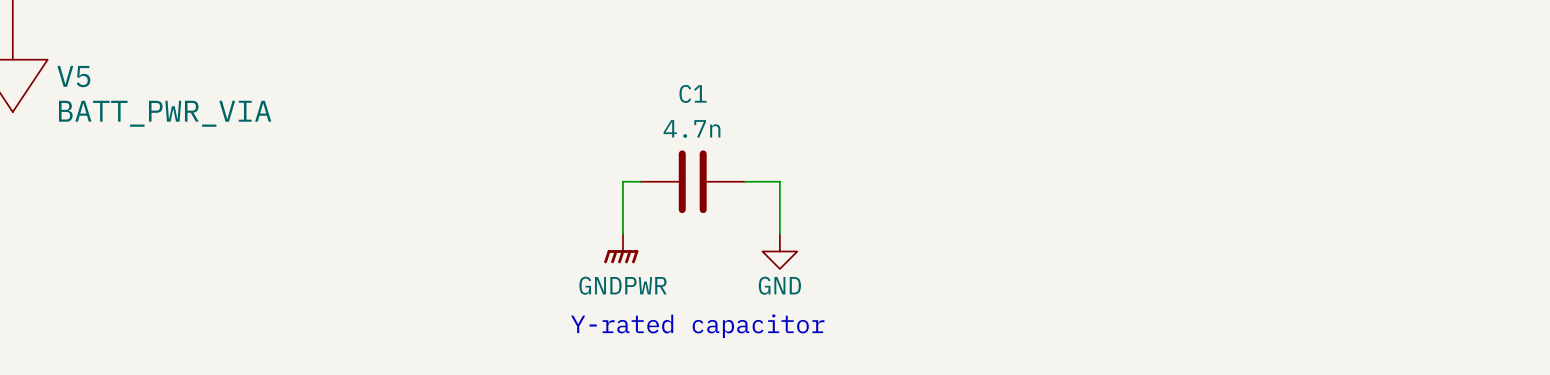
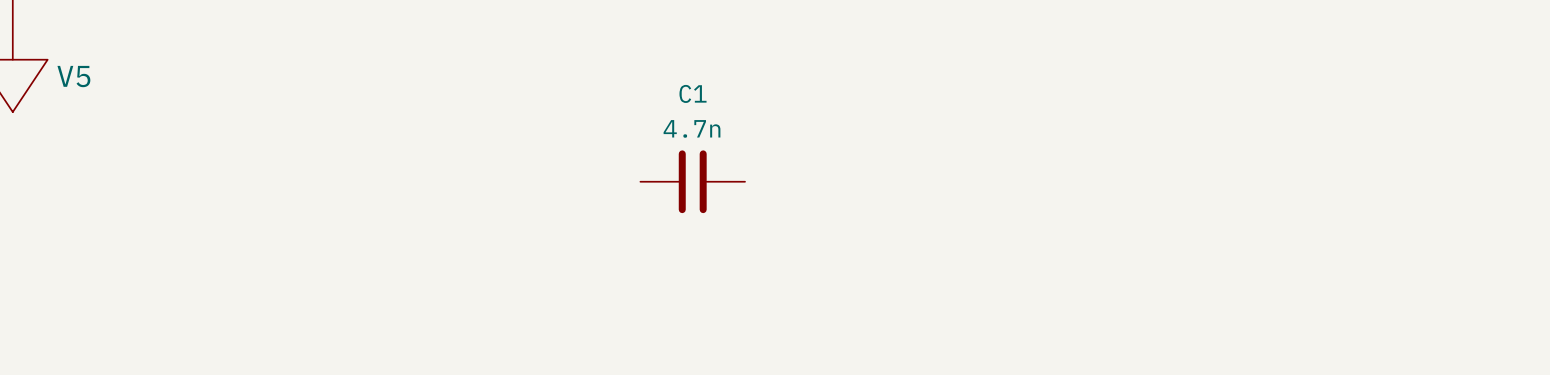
V5 value: BATT_PWR_VIA (165, 113) -> none
wire: (640, 181) (622, 181) (622, 234) -> none
wire: (745, 181) (779, 181) (779, 234) -> none
power symbol: GNDPWR (621, 248) -> none
power symbol: GND (779, 251) -> none
text: Y-rated capacitor (697, 326) -> none

